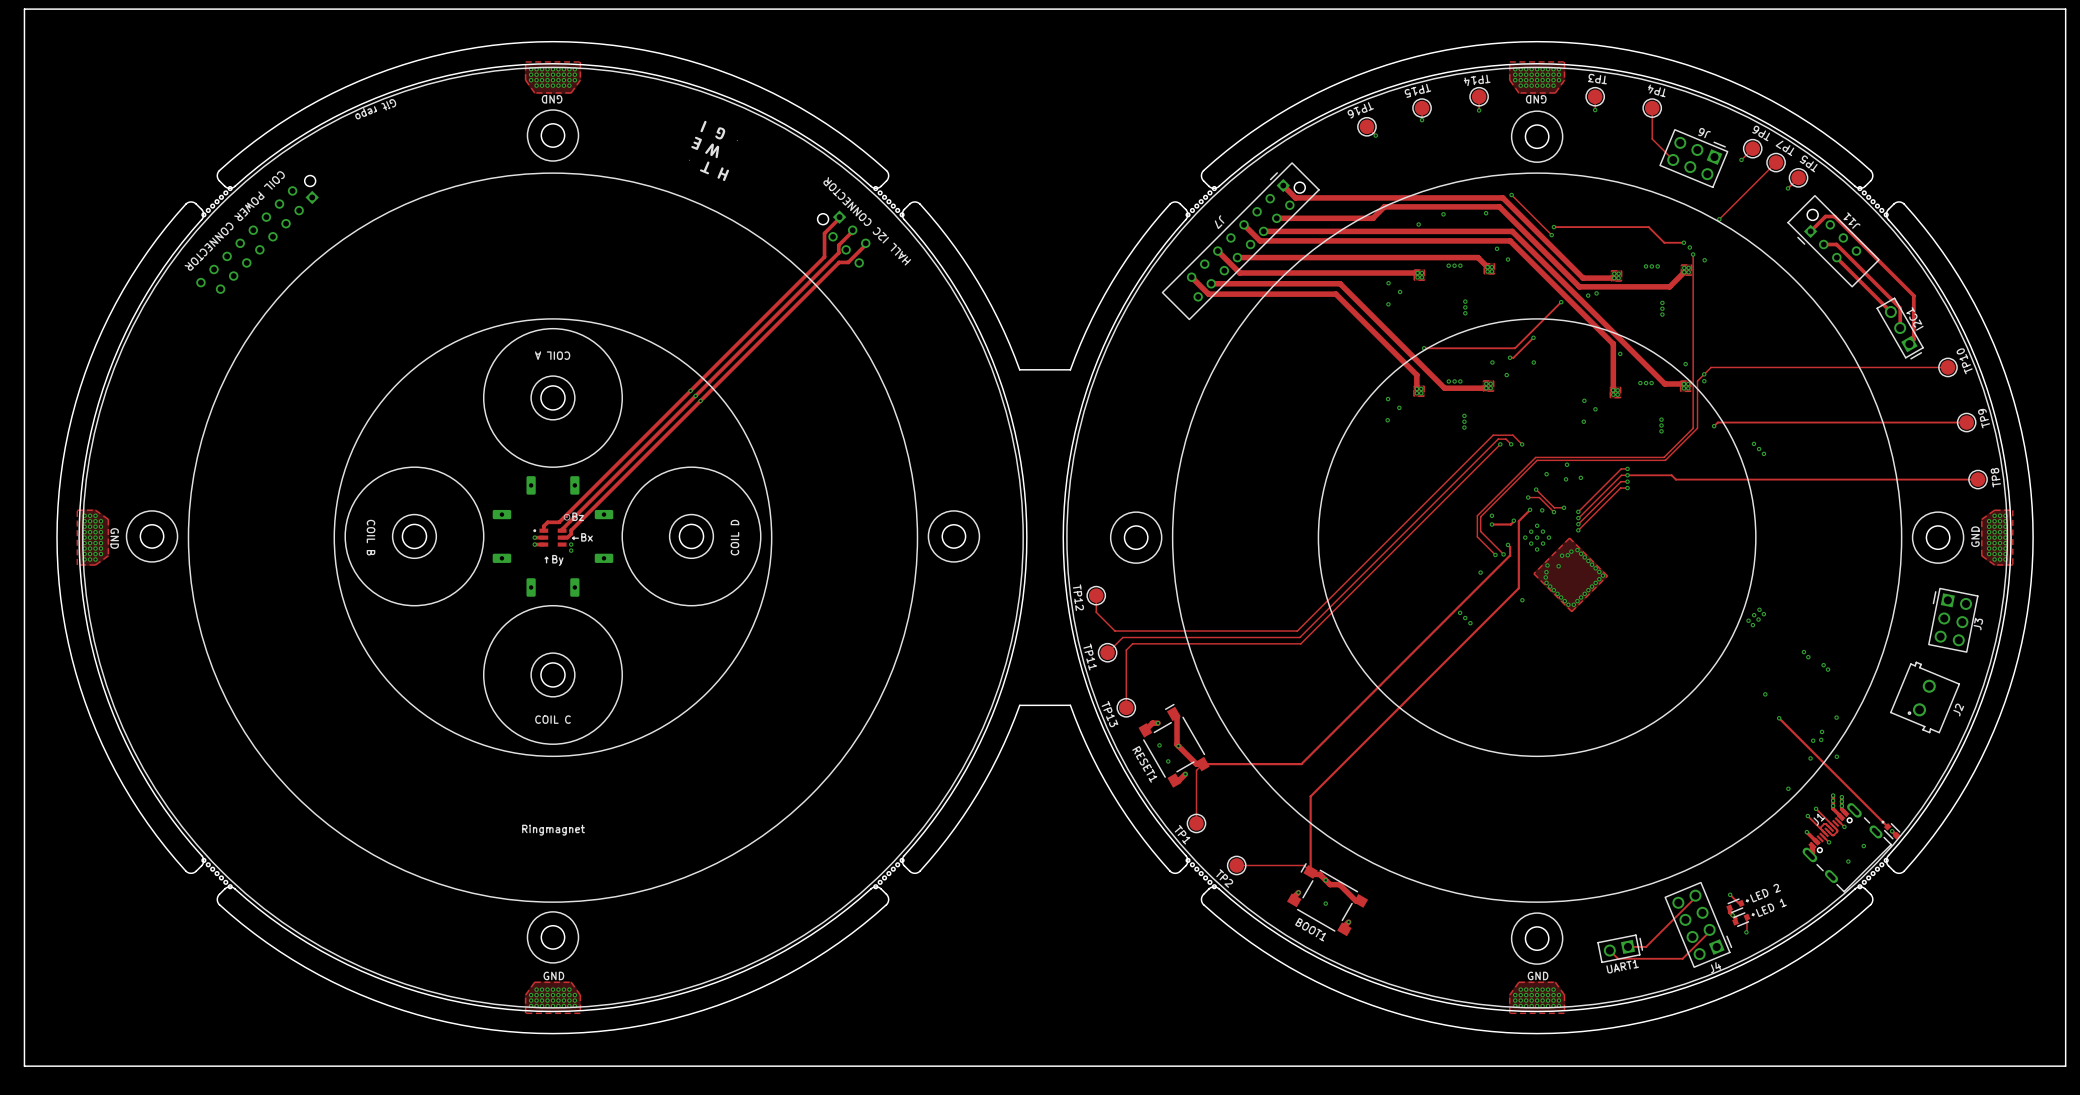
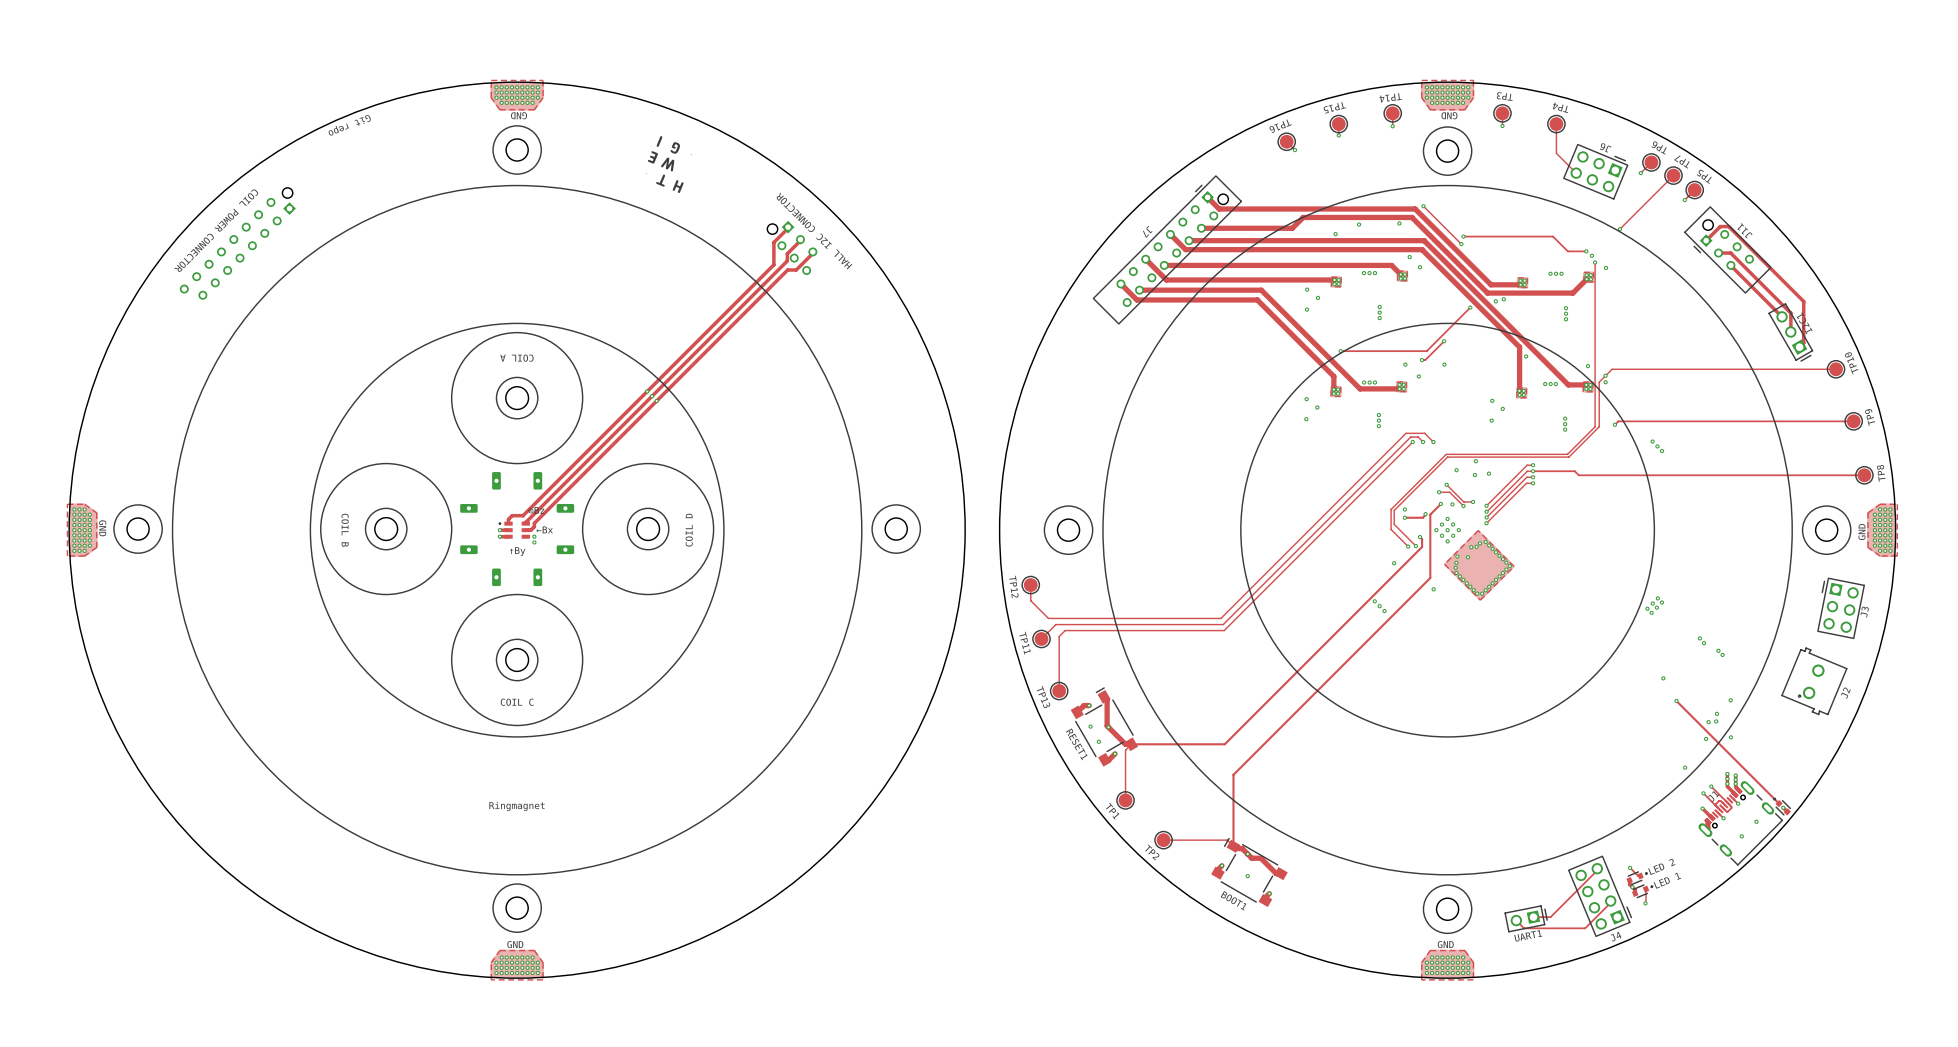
board edge: (24, 9) (2065, 9) (2065, 1066) (24, 1066) (24, 9) -> none
round board edge: none -> [68, 82, 966, 979]
round board edge: none -> [999, 82, 1896, 979]
drawing: [82, 66, 1024, 1009] -> none
drawing: [1066, 66, 2008, 1009] -> none
board edge: (219, 170) (254, 141) (292, 115) (332, 93) (374, 75) (417, 60) (462, 50) (507, 43) (552, 41) (598, 43) (643, 50) (688, 60) (731, 75) (773, 93) (813, 115) (851, 141) (886, 170) -> none
board edge: (1203, 170) (1238, 141) (1276, 115) (1316, 93) (1358, 75) (1401, 60) (1446, 50) (1491, 43) (1537, 41) (1582, 43) (1628, 50) (1672, 60) (1715, 75) (1757, 93) (1797, 115) (1835, 141) (1870, 170) -> none
board edge: (219, 180) (224, 186) -> none
board edge: (886, 180) (881, 186) -> none
board edge: (1203, 180) (1208, 186) -> none
board edge: (1870, 180) (1865, 186) -> none
board edge: (235, 186) (270, 157) (307, 132) (347, 110) (389, 92) (433, 79) (477, 69) (552, 63) (628, 69) (672, 79) (716, 92) (758, 110) (798, 132) (835, 157) (870, 186) -> none
board edge: (1219, 186) (1279, 140) (1318, 117) (1359, 98) (1402, 83) (1446, 72) (1491, 65) (1537, 63) (1582, 65) (1627, 72) (1671, 83) (1714, 98) (1755, 117) (1795, 140) (1855, 186) -> none
part: (218, 202) -> none
part: (887, 202) -> none
part: (1202, 202) -> none
part: (1871, 202) -> none
board edge: (185, 204) (156, 239) (130, 277) (108, 317) (90, 358) (75, 402) (65, 446) (59, 491) (57, 537) (59, 583) (65, 628) (75, 673) (90, 716) (108, 758) (130, 798) (156, 835) (185, 871) -> none
board edge: (196, 204) (201, 209) -> none
board edge: (909, 204) (904, 209) -> none
board edge: (920, 204) (946, 236) (978, 282) (1003, 331) (1019, 369) (1070, 369) (1092, 318) (1112, 282) (1135, 247) (1170, 204) -> none
board edge: (1180, 204) (1185, 209) -> none
board edge: (1893, 204) (1888, 209) -> none
board edge: (1904, 204) (1933, 239) (1959, 277) (1981, 317) (1999, 358) (2014, 402) (2024, 446) (2030, 491) (2033, 537) (2030, 583) (2024, 628) (2014, 673) (1999, 716) (1981, 758) (1959, 798) (1933, 835) (1904, 871) -> none
board edge: (201, 219) (172, 254) (147, 292) (113, 360) (98, 403) (87, 447) (81, 492) (79, 537) (81, 583) (87, 627) (98, 672) (113, 715) (147, 782) (172, 820) (201, 855) -> none
board edge: (904, 219) (950, 279) (973, 318) (992, 360) (1007, 403) (1018, 447) (1024, 492) (1026, 537) (1024, 583) (1018, 627) (1007, 672) (992, 715) (973, 756) (950, 795) (904, 855) -> none
board edge: (1185, 219) (1139, 279) (1116, 318) (1097, 360) (1082, 403) (1071, 447) (1065, 492) (1063, 537) (1065, 583) (1071, 627) (1082, 672) (1097, 715) (1116, 756) (1139, 795) (1185, 855) -> none
board edge: (1888, 219) (1917, 254) (1942, 292) (1964, 332) (1981, 374) (1995, 417) (2004, 462) (2010, 537) (2008, 583) (2002, 627) (1981, 700) (1964, 742) (1942, 782) (1917, 820) (1888, 855) -> none
board edge: (201, 865) (196, 871) -> none
board edge: (904, 865) (909, 871) -> none
board edge: (1185, 865) (1180, 871) -> none
board edge: (1888, 865) (1893, 871) -> none
board edge: (920, 871) (955, 827) (978, 793) (998, 756) (1019, 705) (1070, 705) (1086, 743) (1112, 793) (1143, 839) (1170, 871) -> none
part: (218, 872) -> none
part: (887, 872) -> none
part: (1202, 872) -> none
part: (1871, 872) -> none
board edge: (224, 889) (219, 894) -> none
board edge: (235, 889) (270, 917) (307, 943) (347, 964) (389, 982) (462, 1002) (507, 1009) (552, 1011) (598, 1009) (643, 1002) (687, 992) (730, 977) (798, 943) (835, 917) (870, 889) -> none
board edge: (881, 889) (886, 894) -> none
board edge: (1208, 889) (1203, 894) -> none
board edge: (1219, 889) (1254, 917) (1292, 943) (1332, 964) (1373, 982) (1417, 996) (1461, 1005) (1537, 1011) (1612, 1005) (1657, 996) (1700, 982) (1742, 964) (1782, 943) (1819, 917) (1855, 889) -> none
board edge: (1865, 889) (1870, 894) -> none
board edge: (219, 904) (254, 933) (292, 959) (332, 981) (374, 1000) (417, 1014) (462, 1025) (507, 1031) (552, 1033) (598, 1031) (643, 1025) (688, 1014) (731, 1000) (773, 981) (813, 959) (851, 933) (886, 904) -> none
board edge: (1203, 904) (1238, 933) (1276, 959) (1316, 981) (1358, 1000) (1401, 1014) (1446, 1025) (1491, 1031) (1537, 1033) (1582, 1031) (1628, 1025) (1672, 1014) (1715, 1000) (1757, 981) (1797, 959) (1835, 933) (1870, 904) -> none

